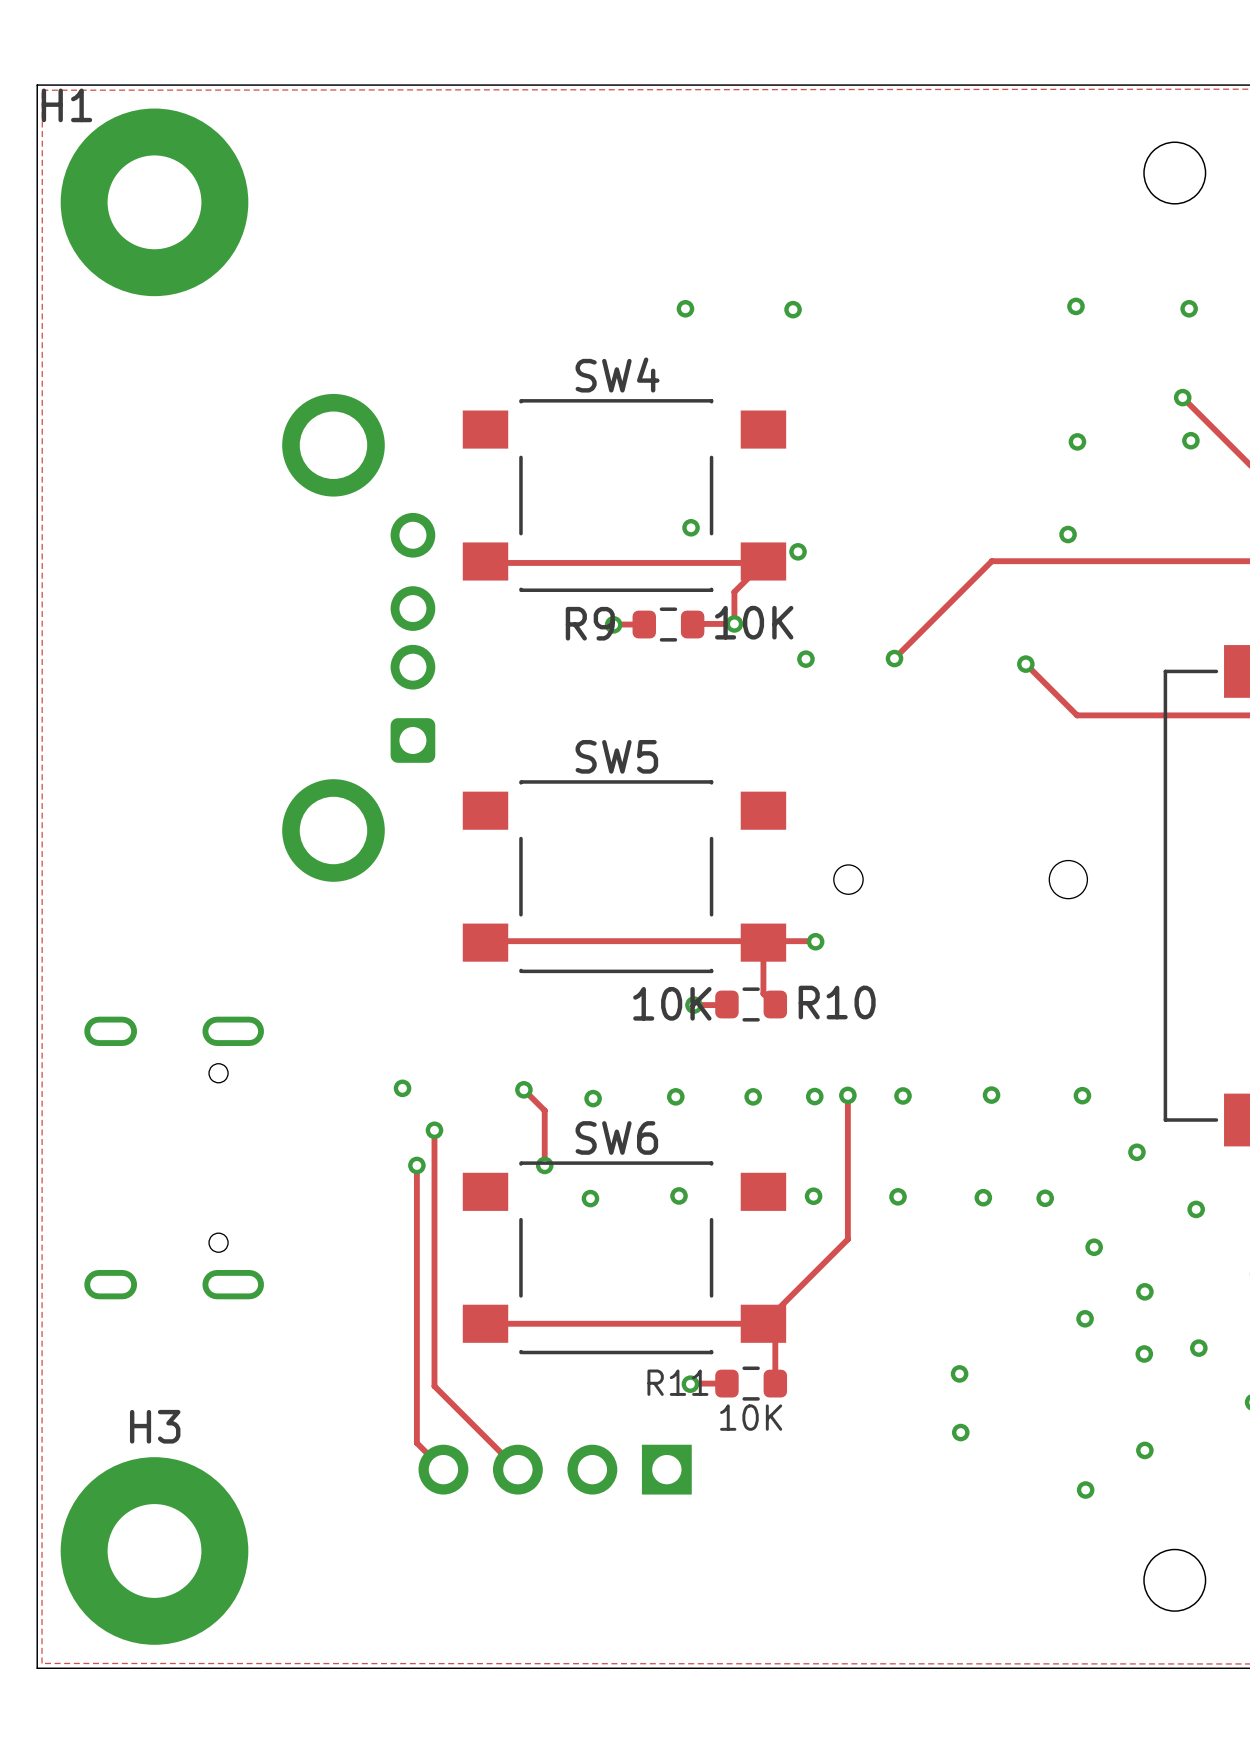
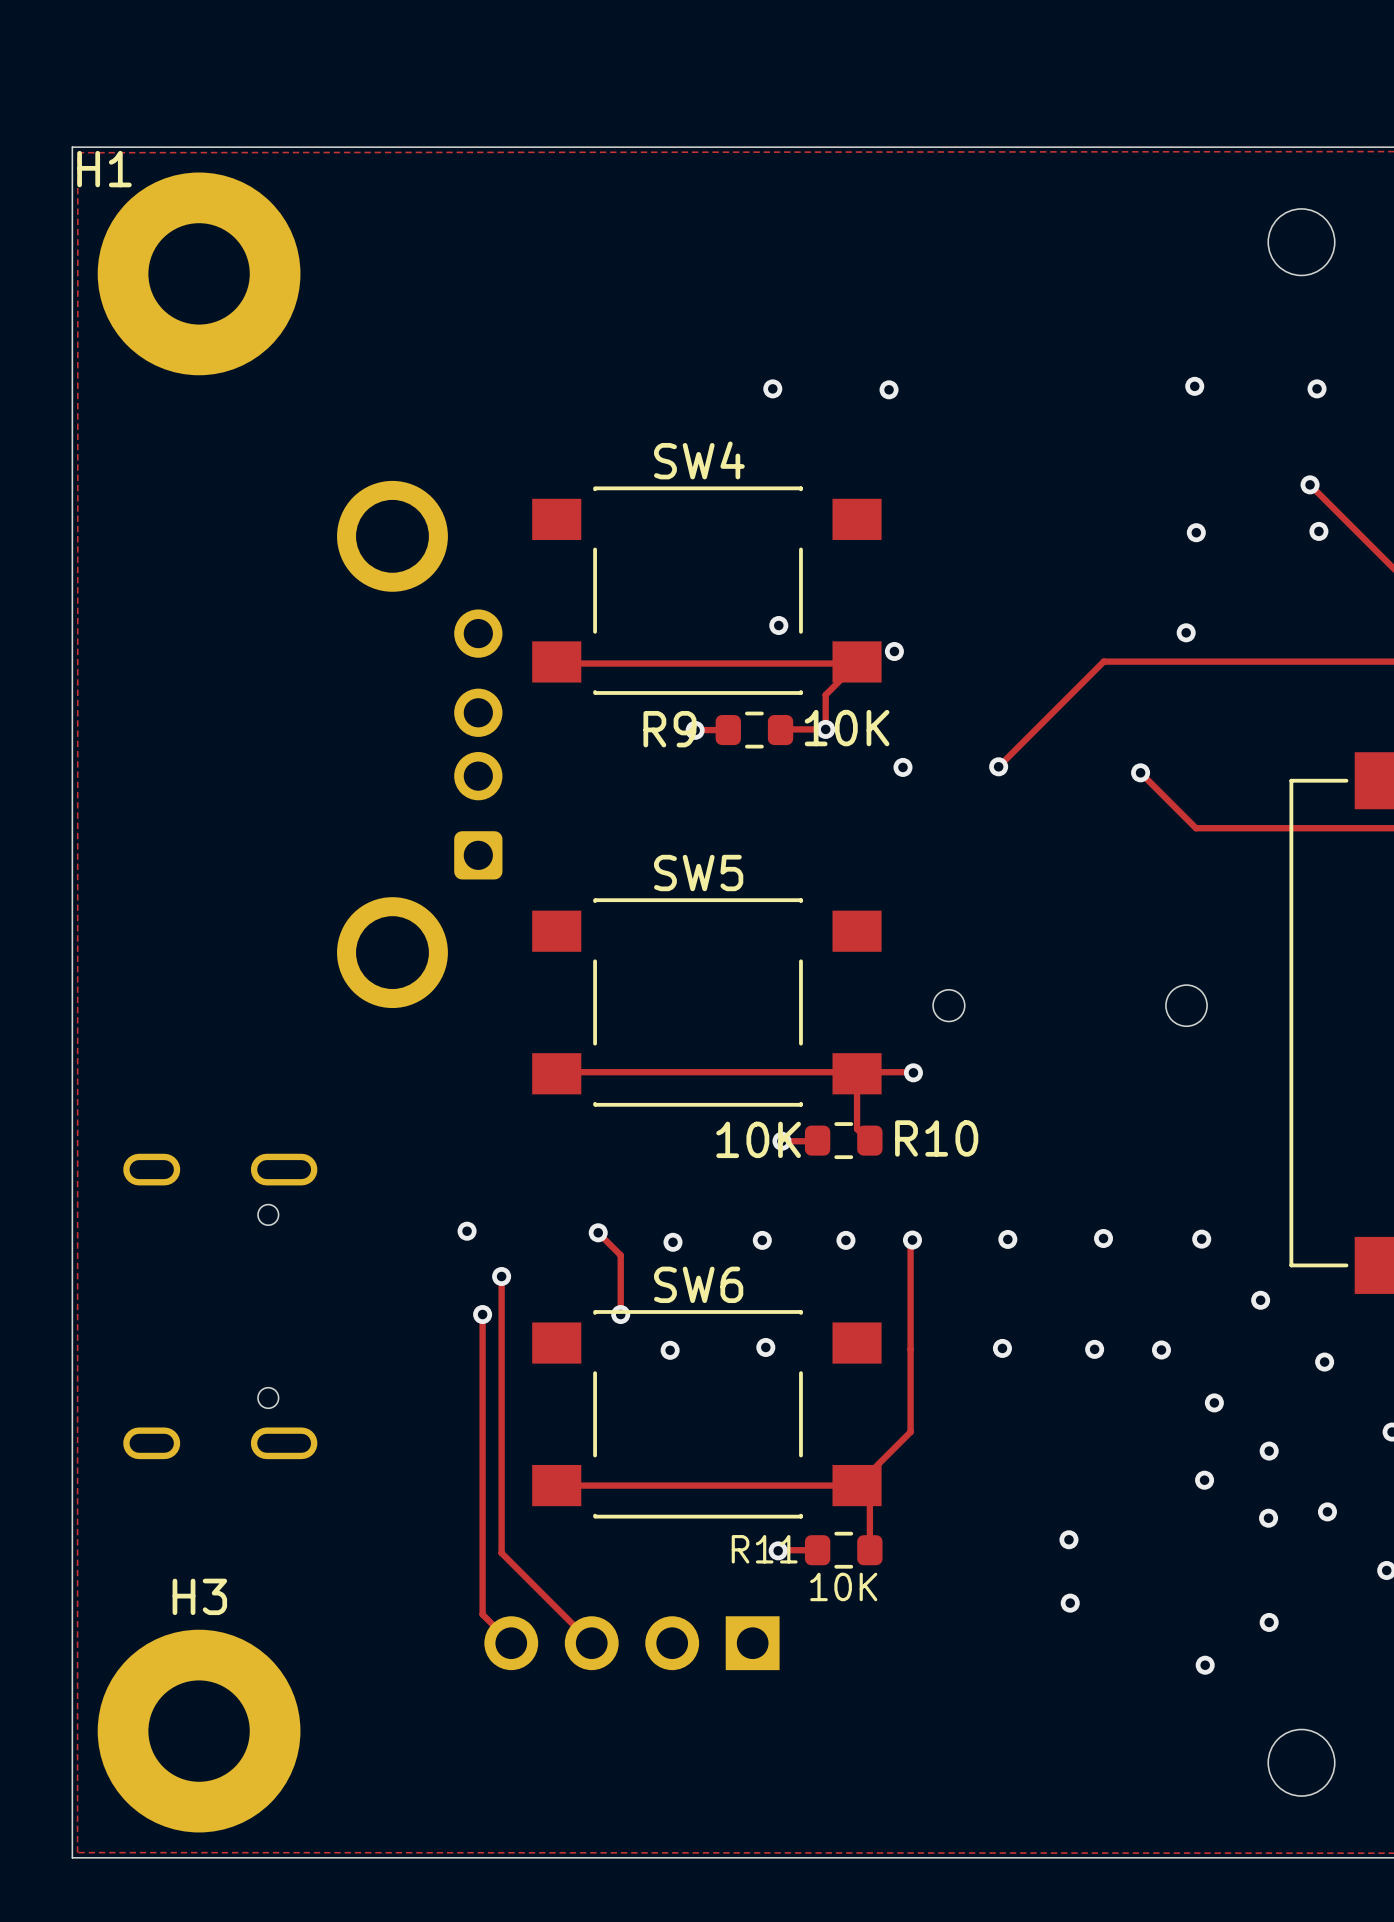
track: (847, 1095) (847, 1239) (812, 1274) -> (910, 1240) (910, 1432)
via: (847, 1095) -> none
via: (813, 1196) -> none

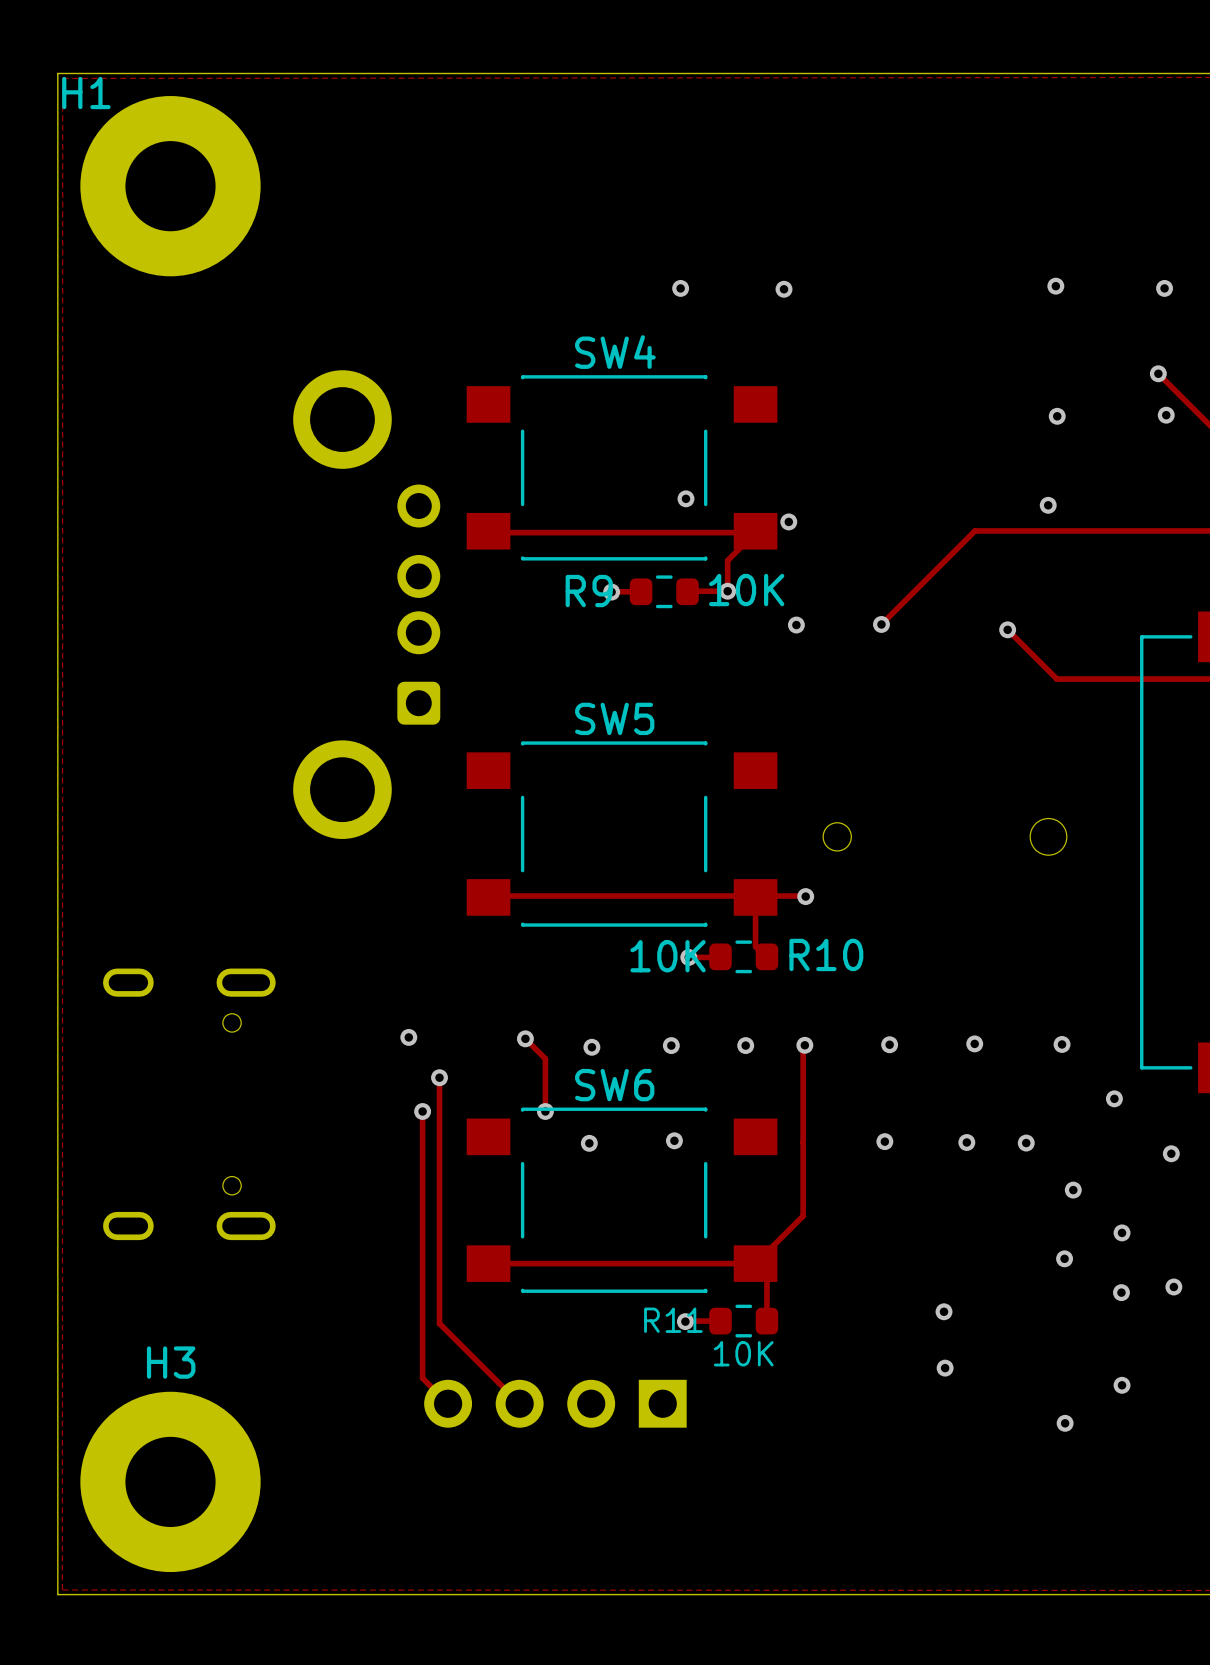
round board edge: [1267, 208, 1336, 277] -> none
round board edge: [1267, 1728, 1336, 1797] -> none

